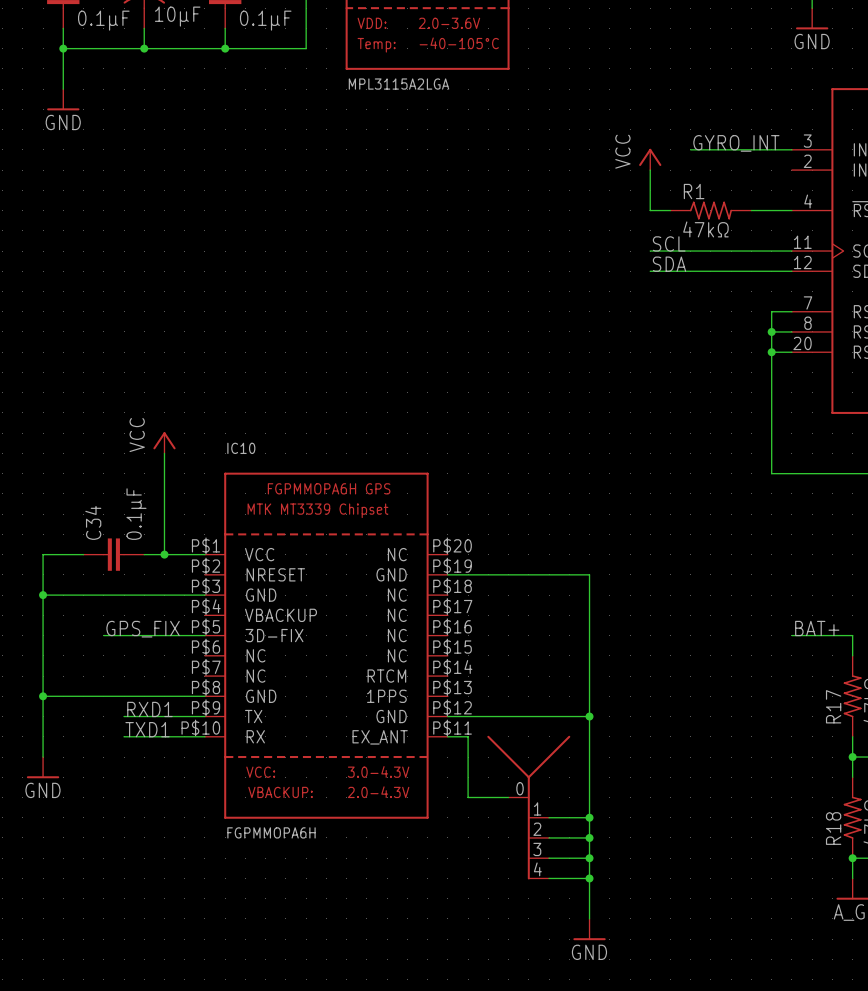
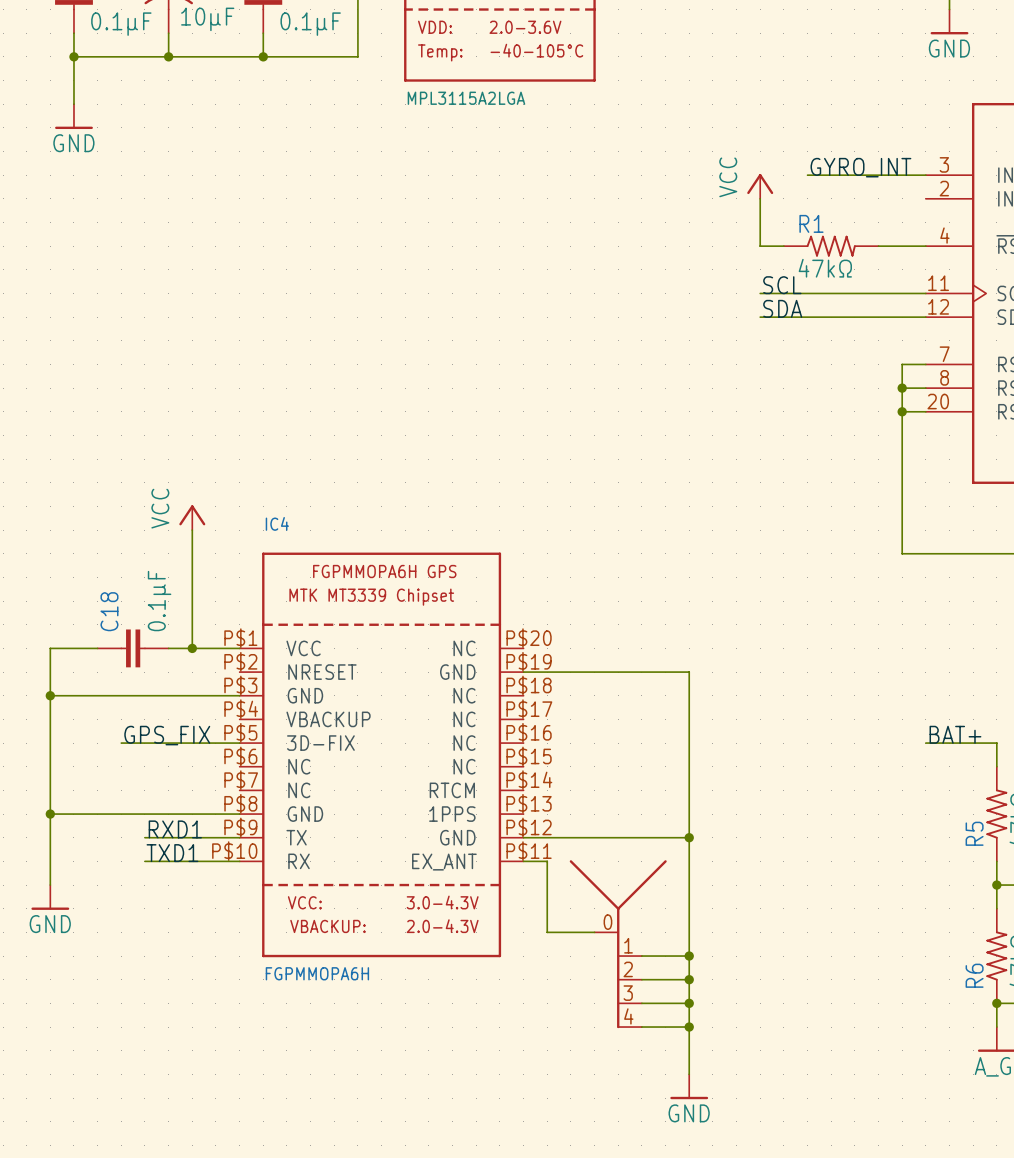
IC10 name: IC10 (241, 448) -> IC4 (277, 523)
C34 name: C34 (93, 522) -> C18 (109, 611)
R17 name: R17 (833, 706) -> R5 (974, 833)
R18 name: R18 (833, 828) -> R6 (974, 975)

